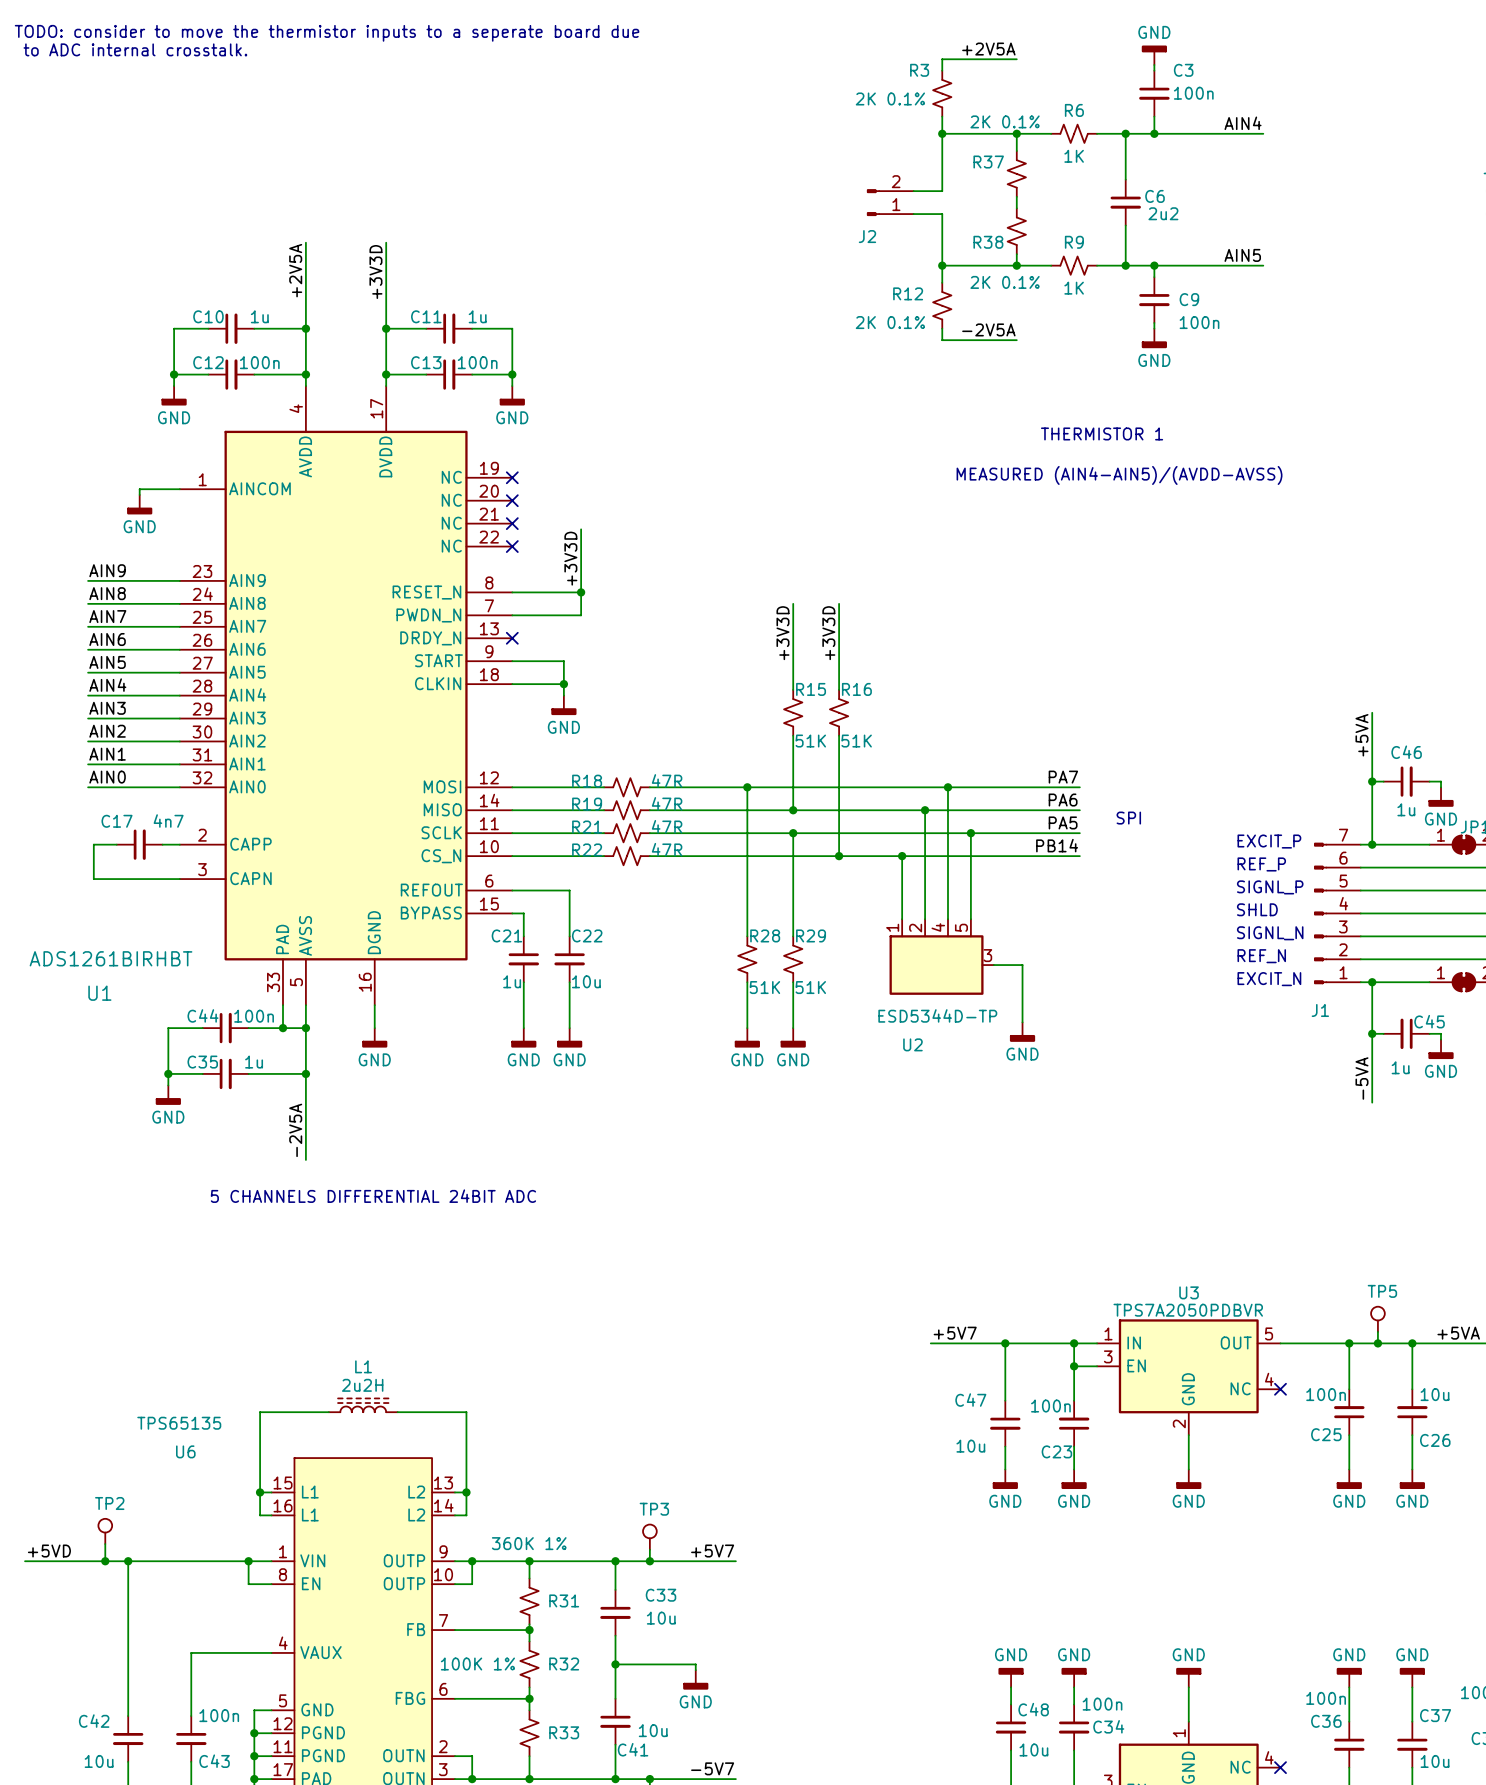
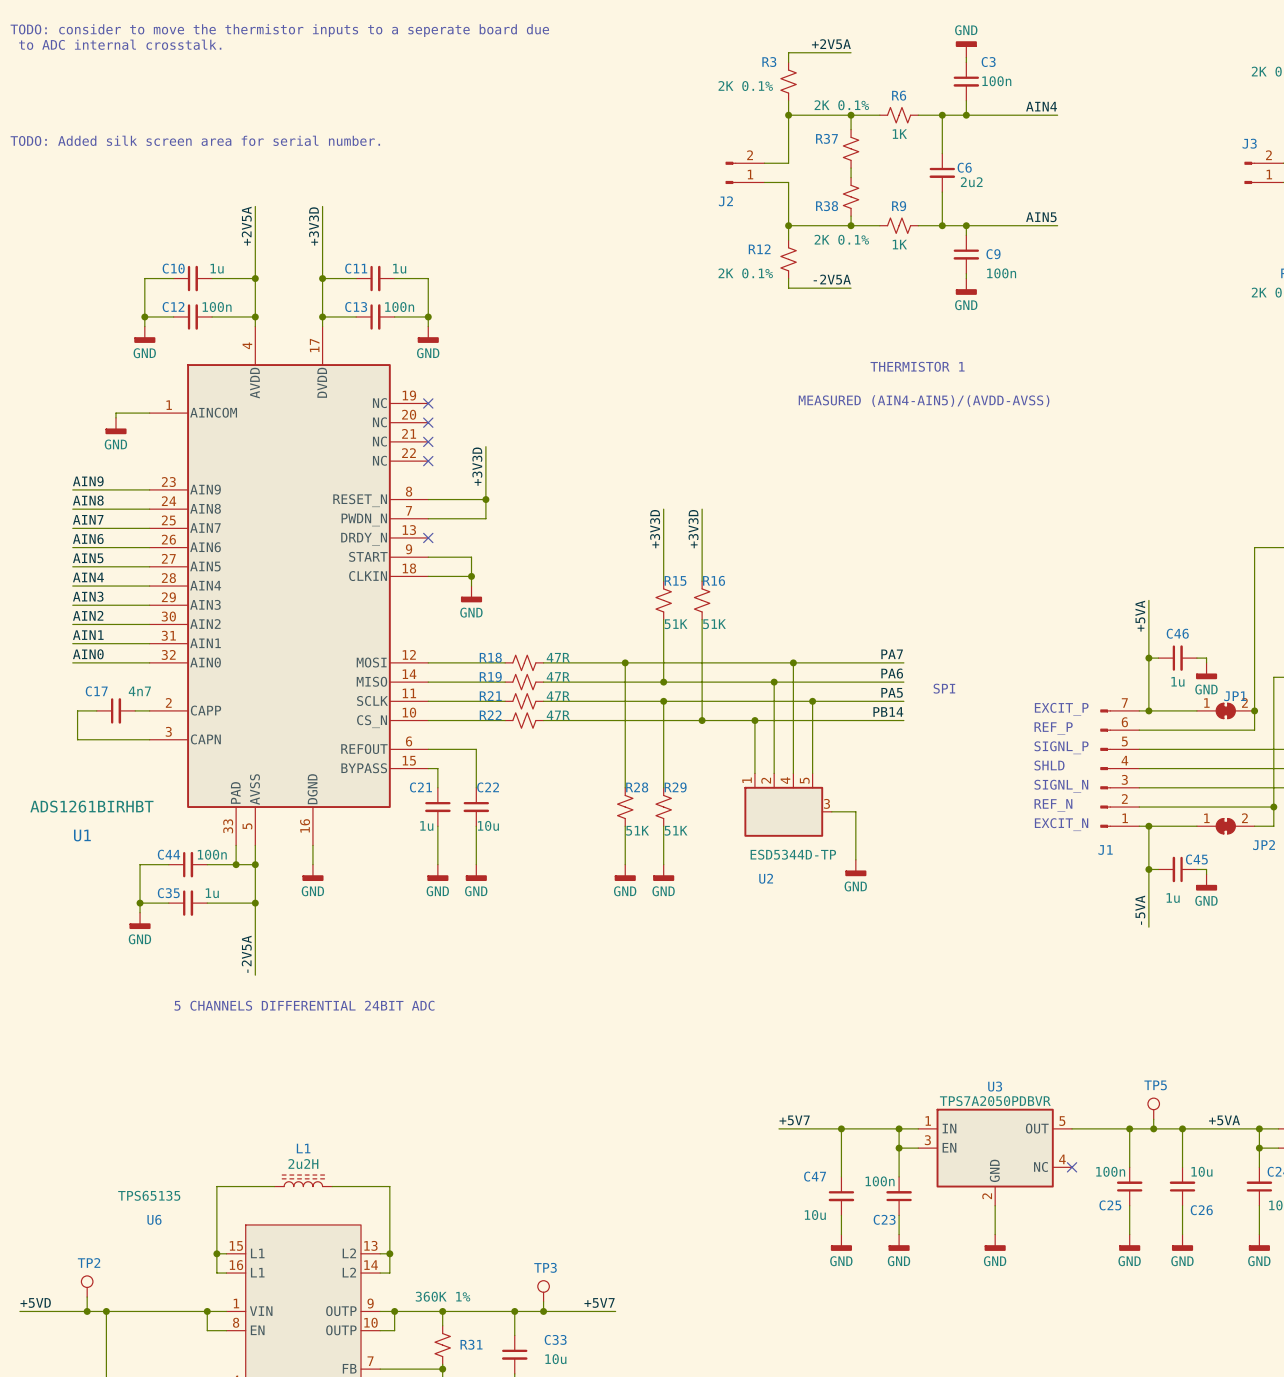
text: none -> TODO: Added silk screen area for serial number. (195, 140)

